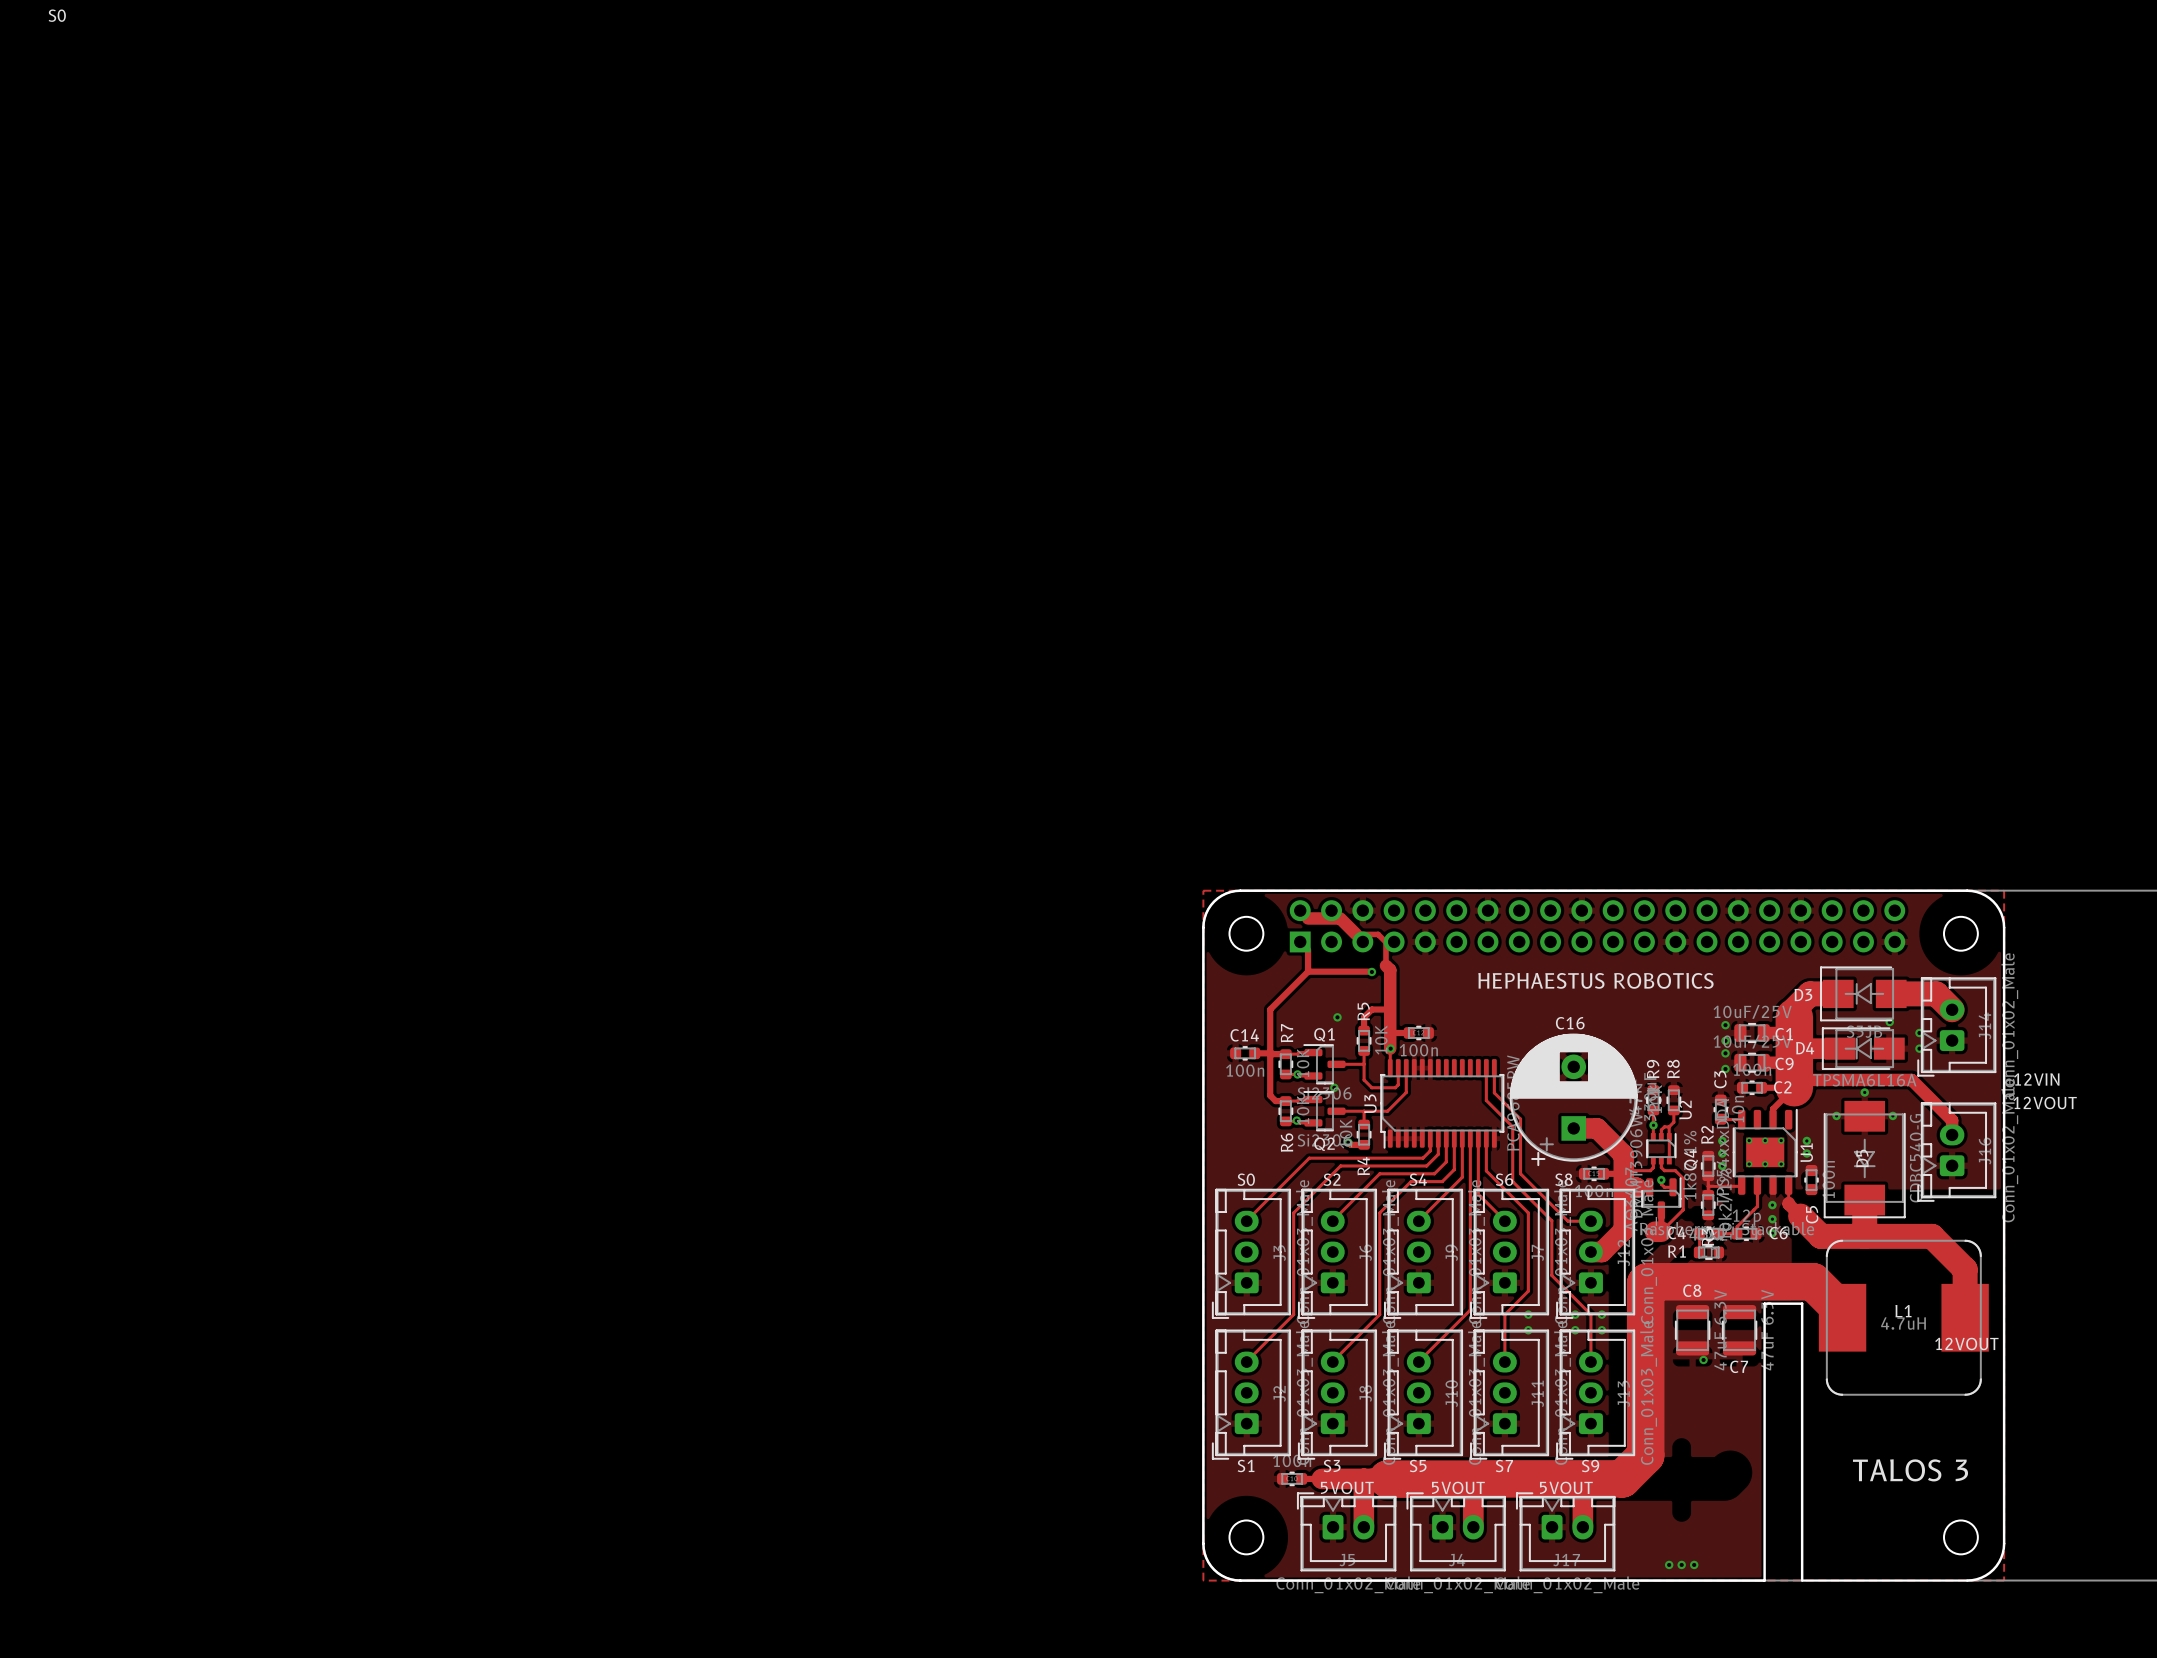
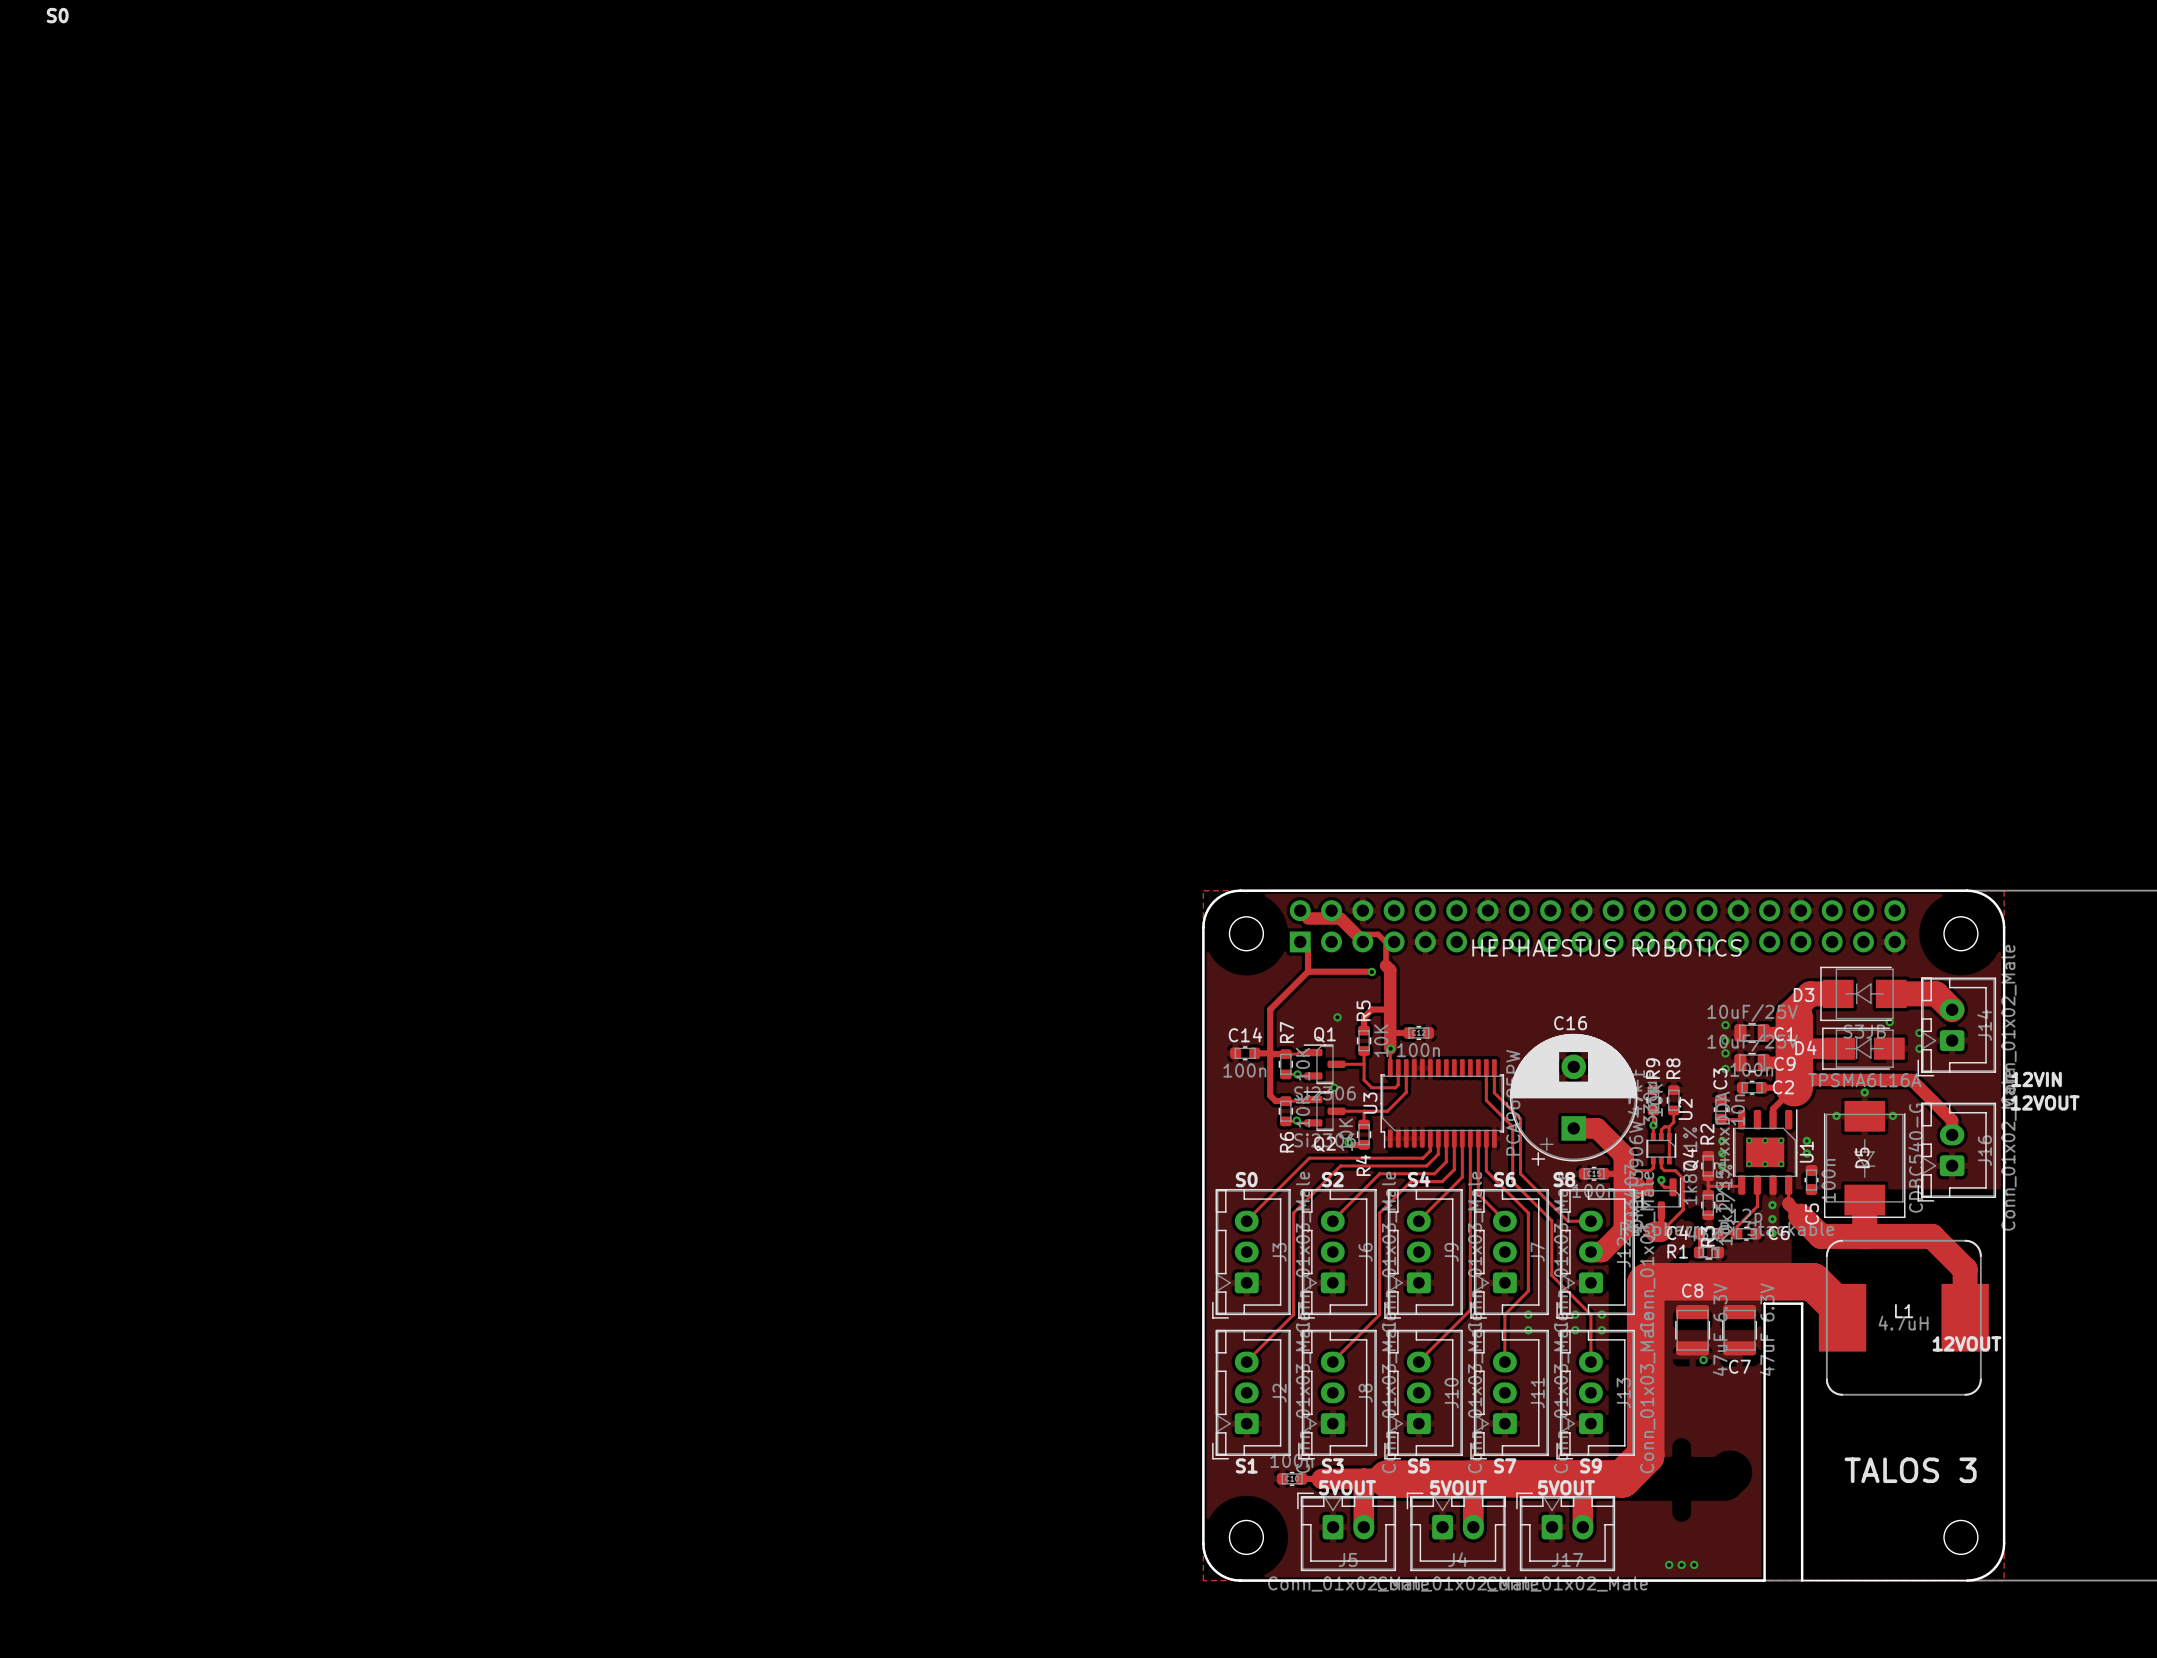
text position: HEPHAESTUS ROBOTICS (1595, 980) -> HEPHAESTUS ROBOTICS (1606, 947)

